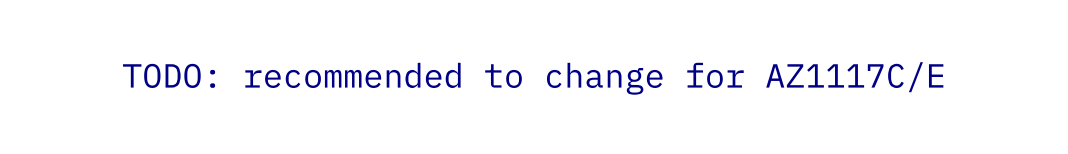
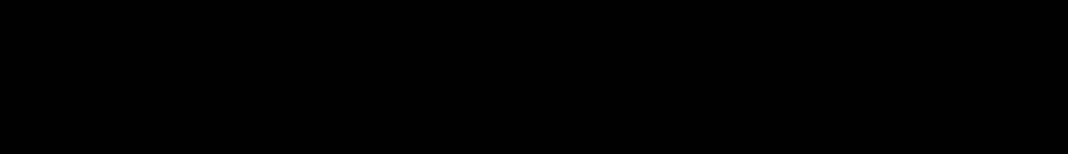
text: TODO: recommended to change for AZ1117C/E (533, 78) -> none

